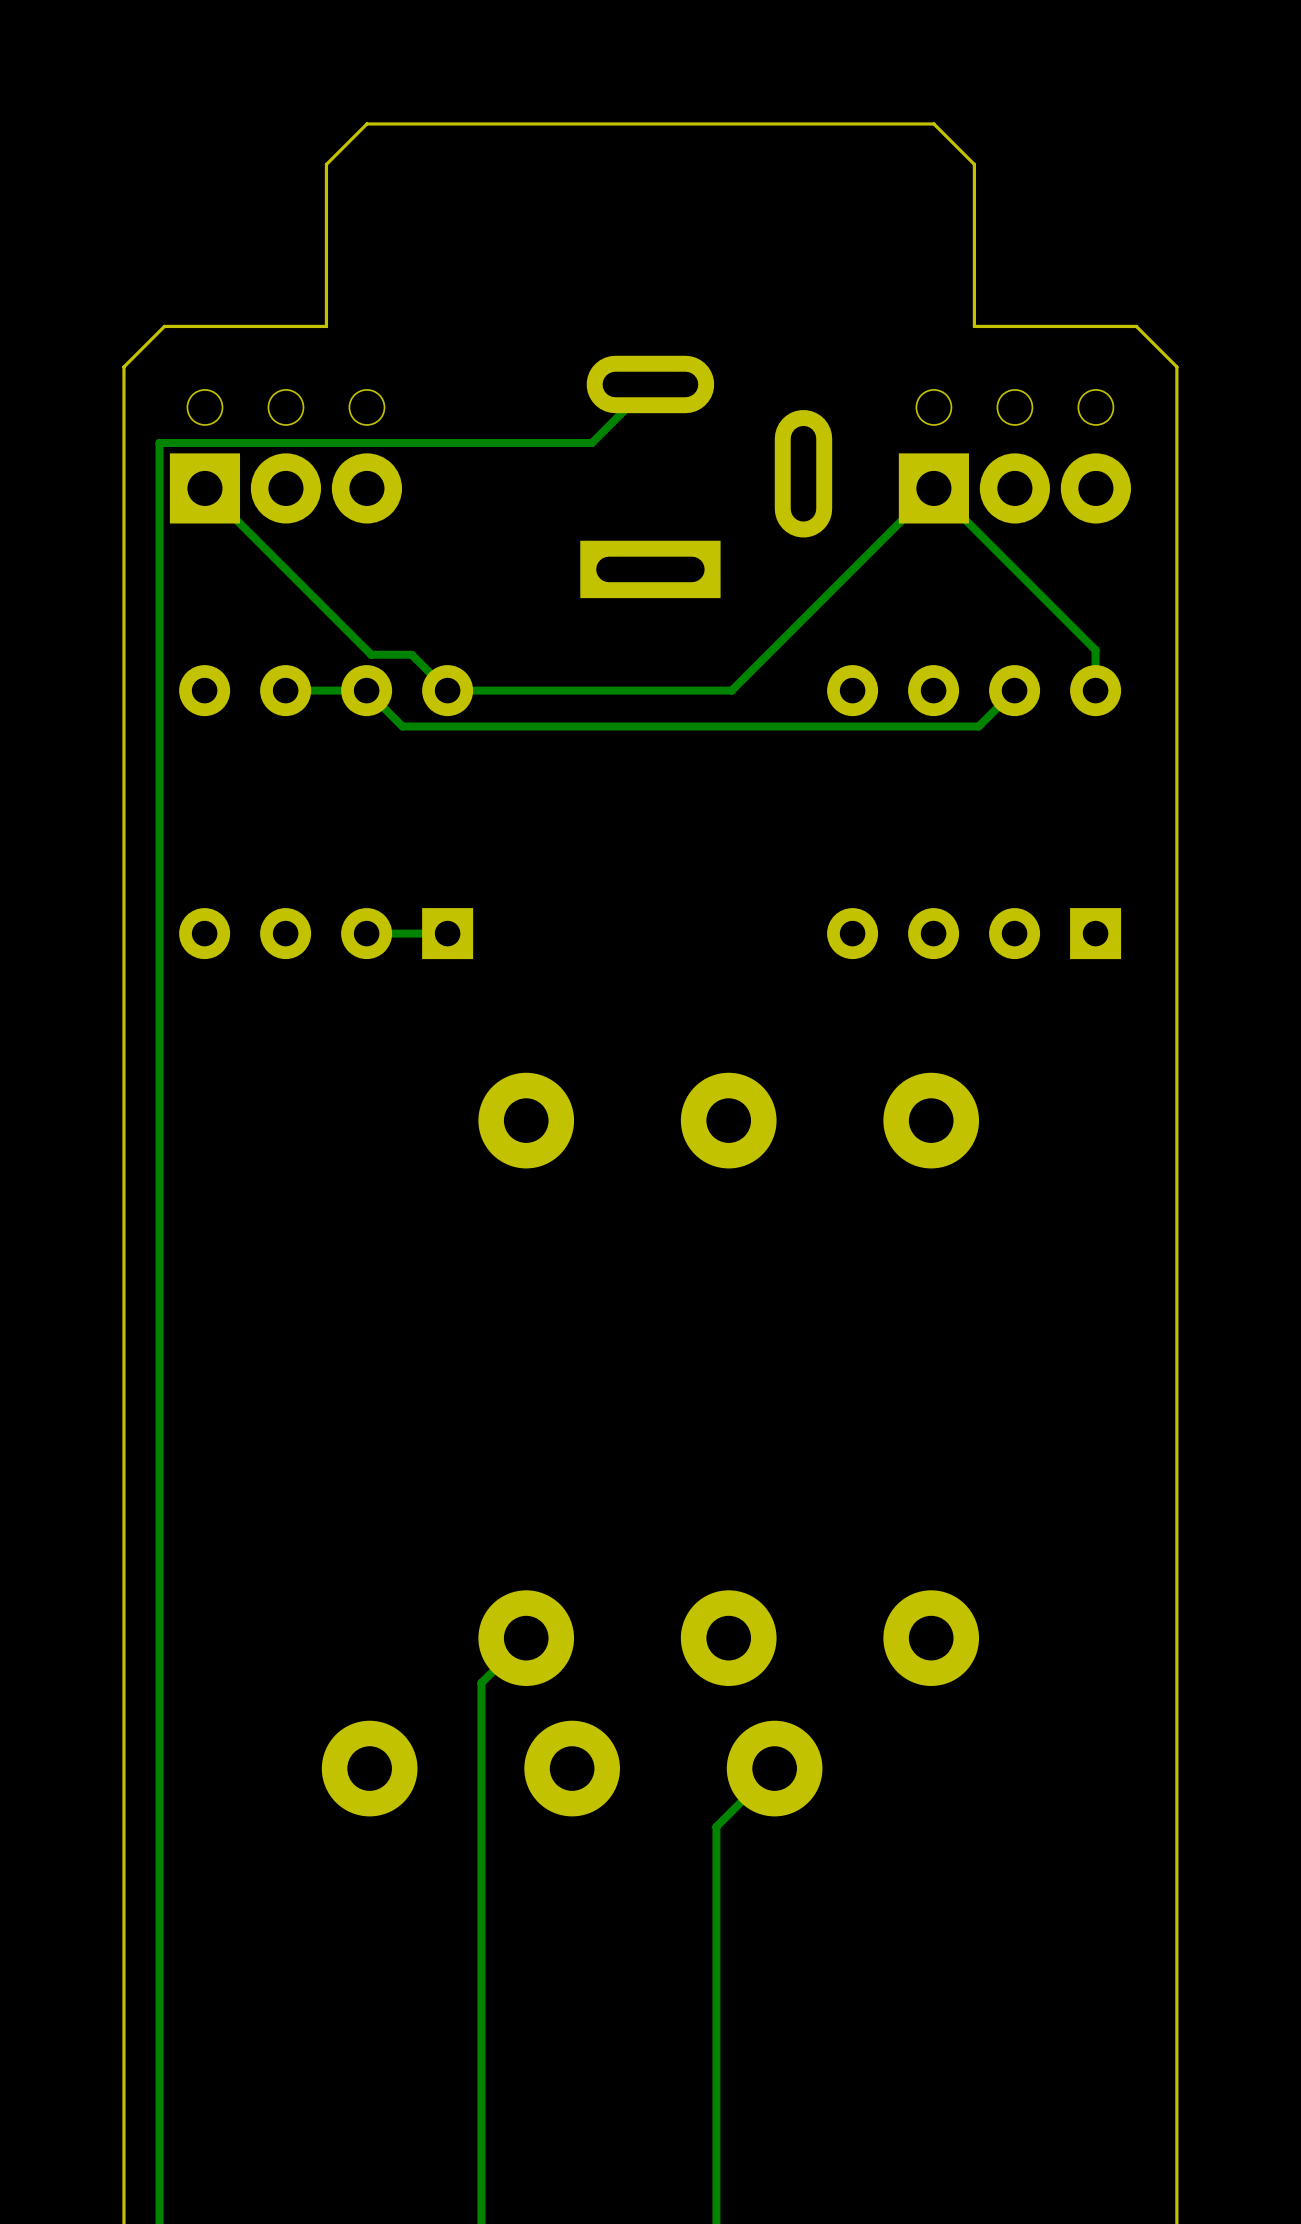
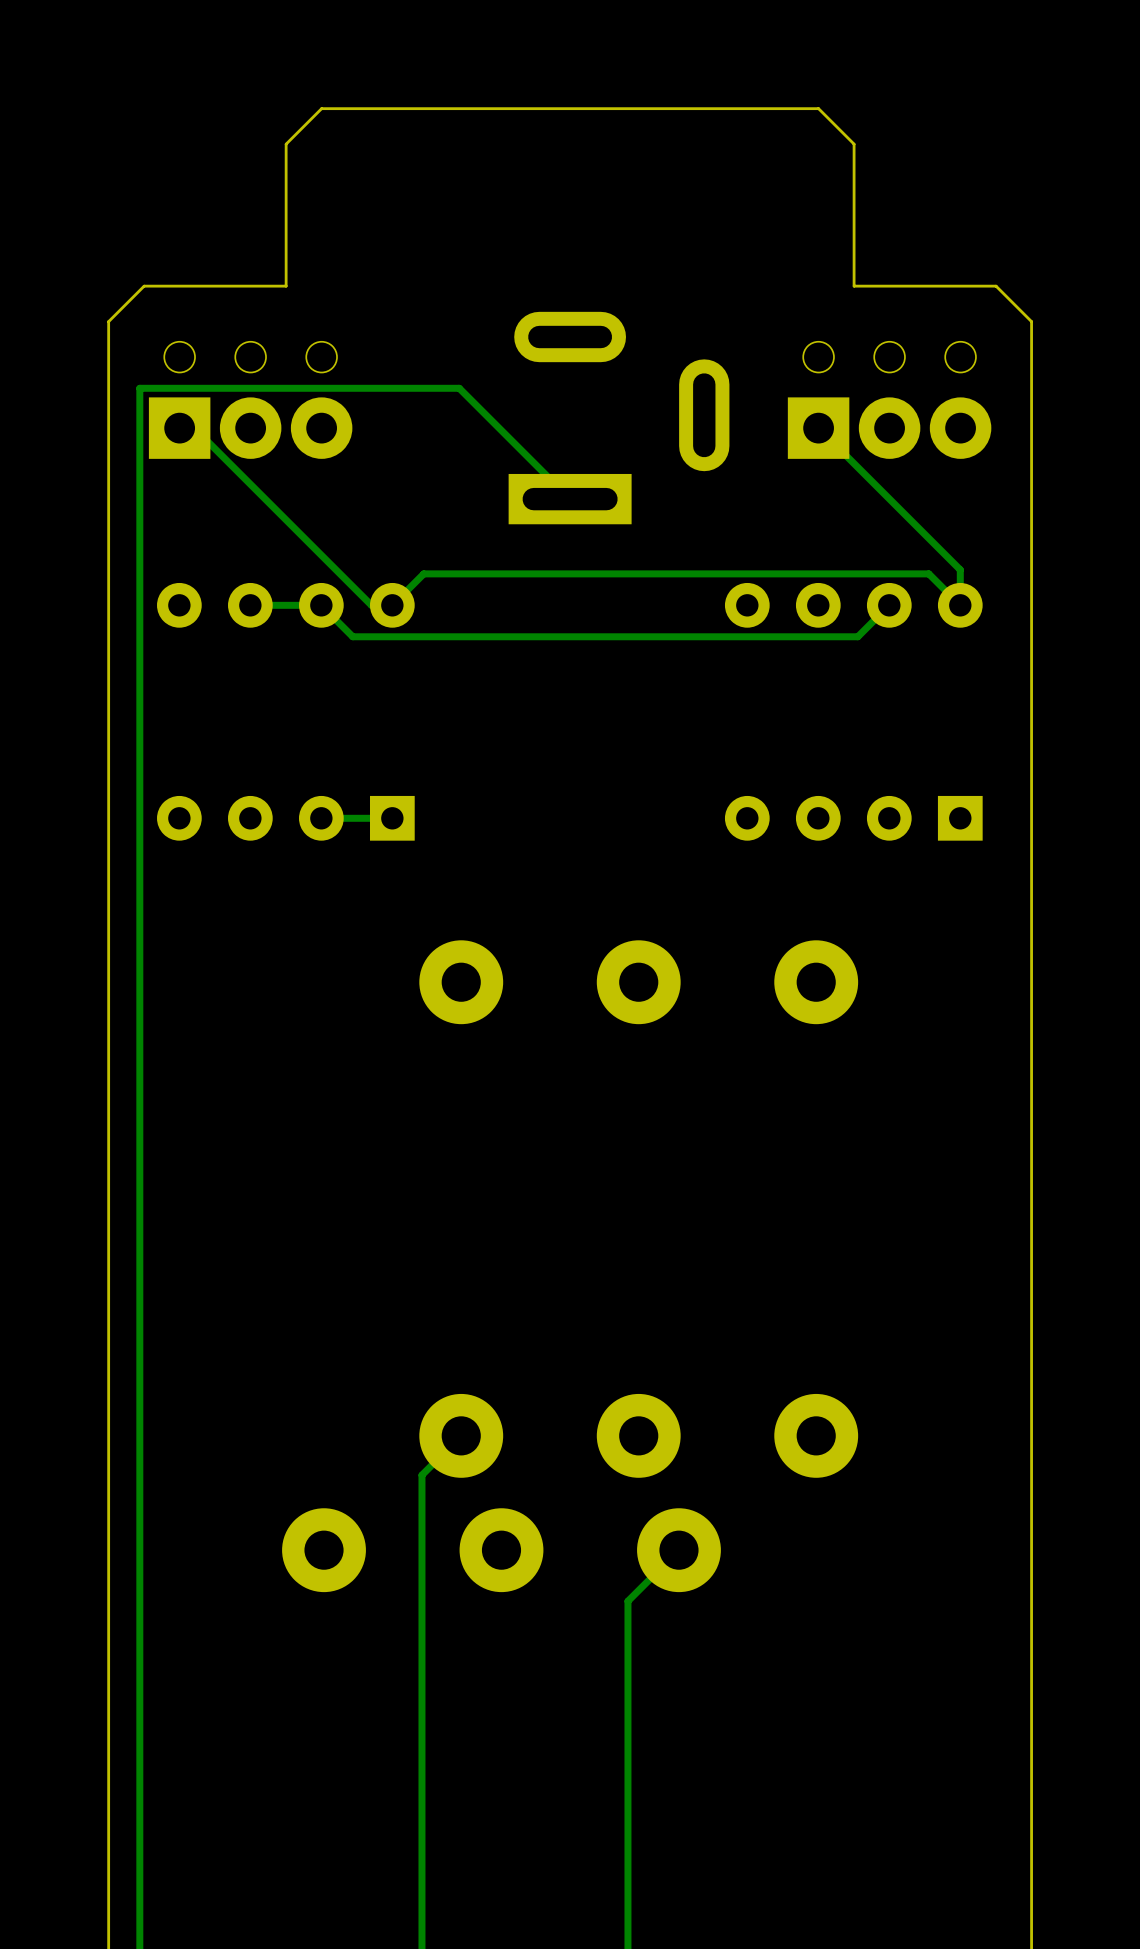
track: (650, 384) (591, 442) (523, 442) -> (570, 499) (459, 388)
track: (933, 488) (731, 690) (447, 690) (411, 654) (371, 654) (204, 488) -> (960, 605) (928, 573) (423, 573) (392, 605) (371, 605) (194, 428) (179, 428)

